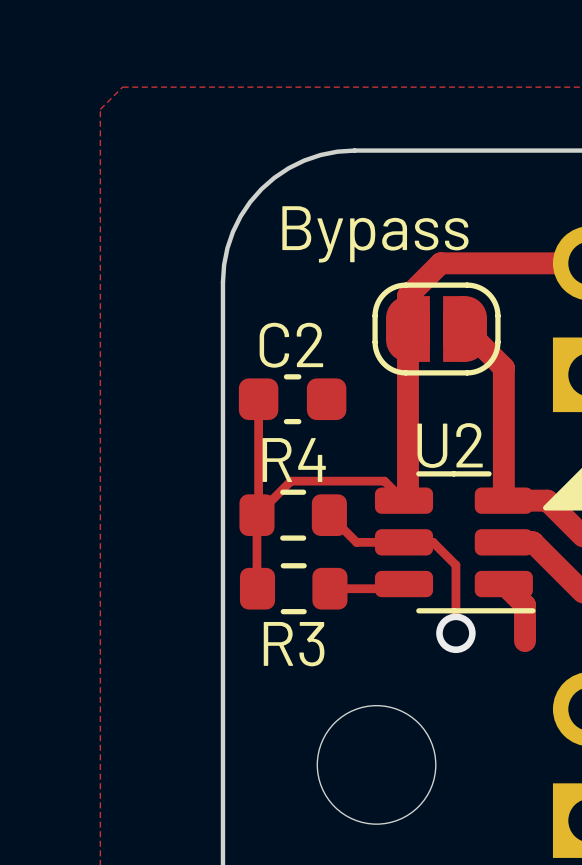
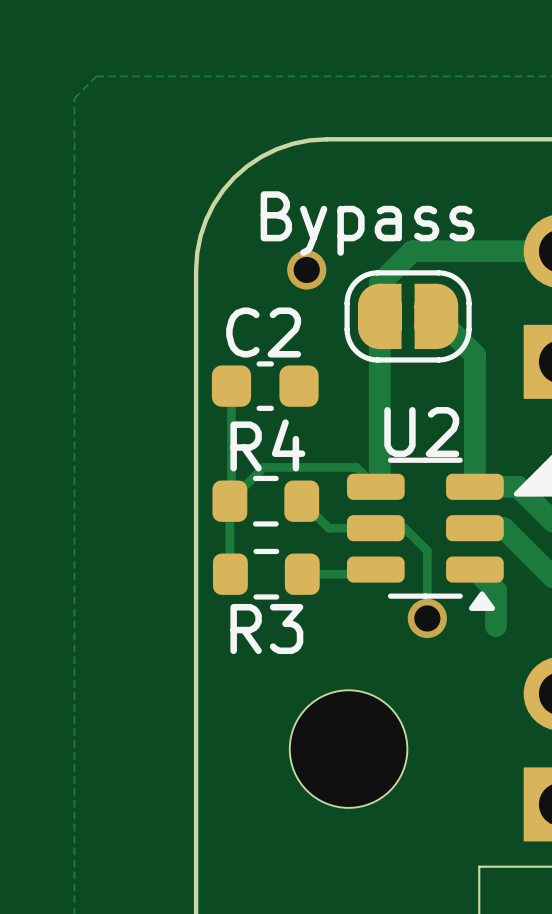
via: none -> (306, 269)
U2 footprint: [374, 471, 536, 614] -> [346, 457, 504, 611]

